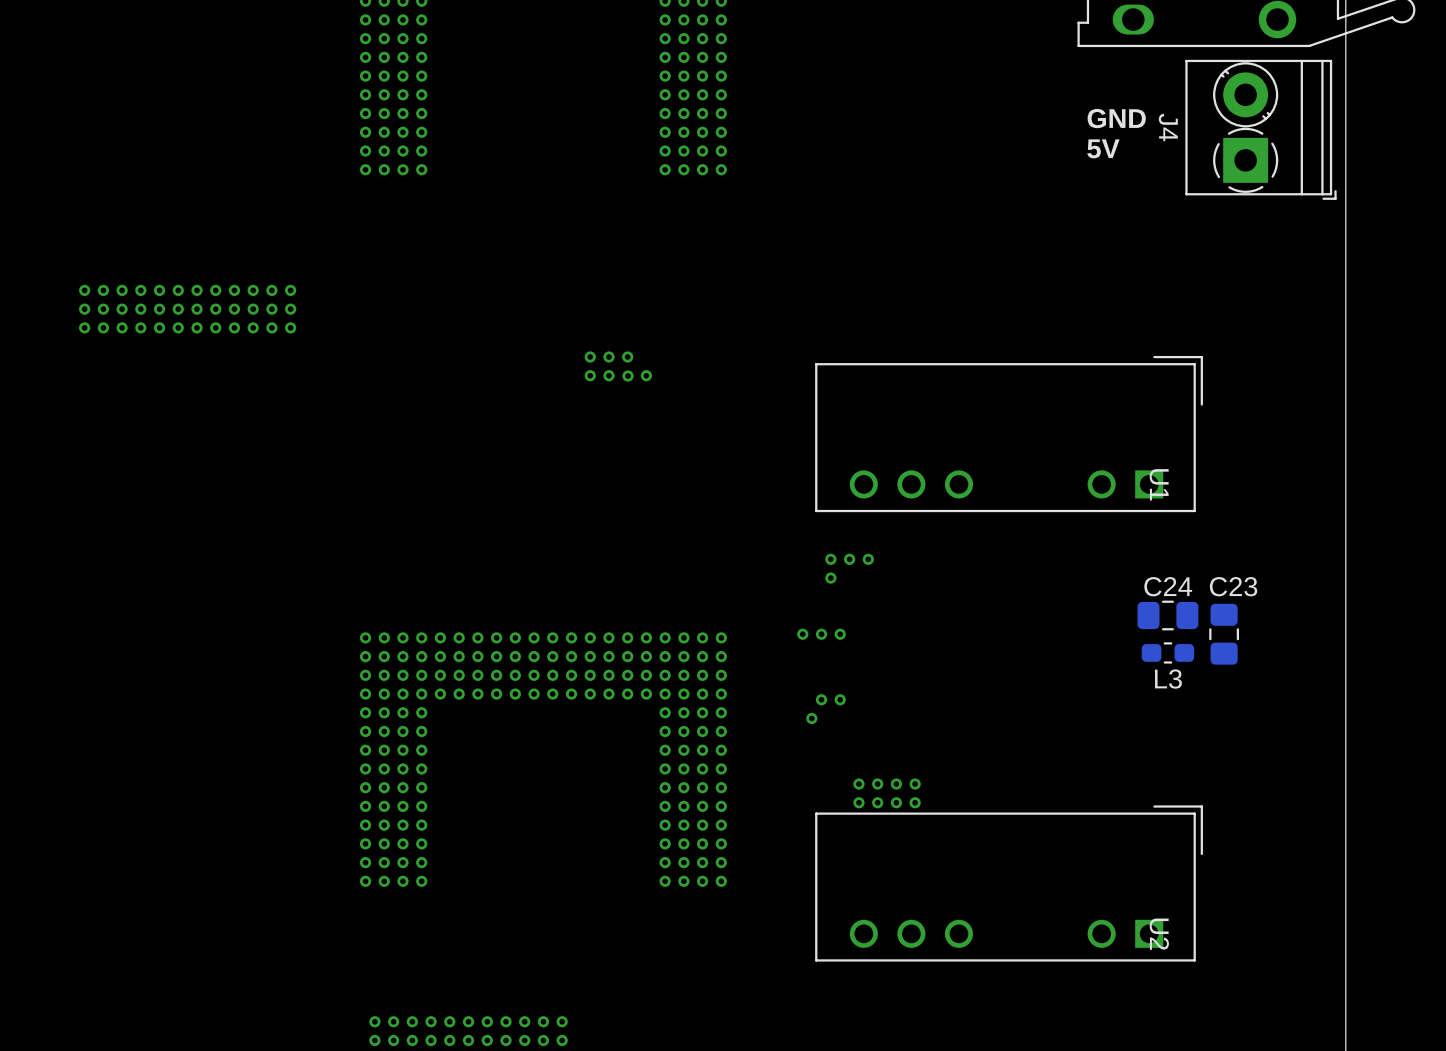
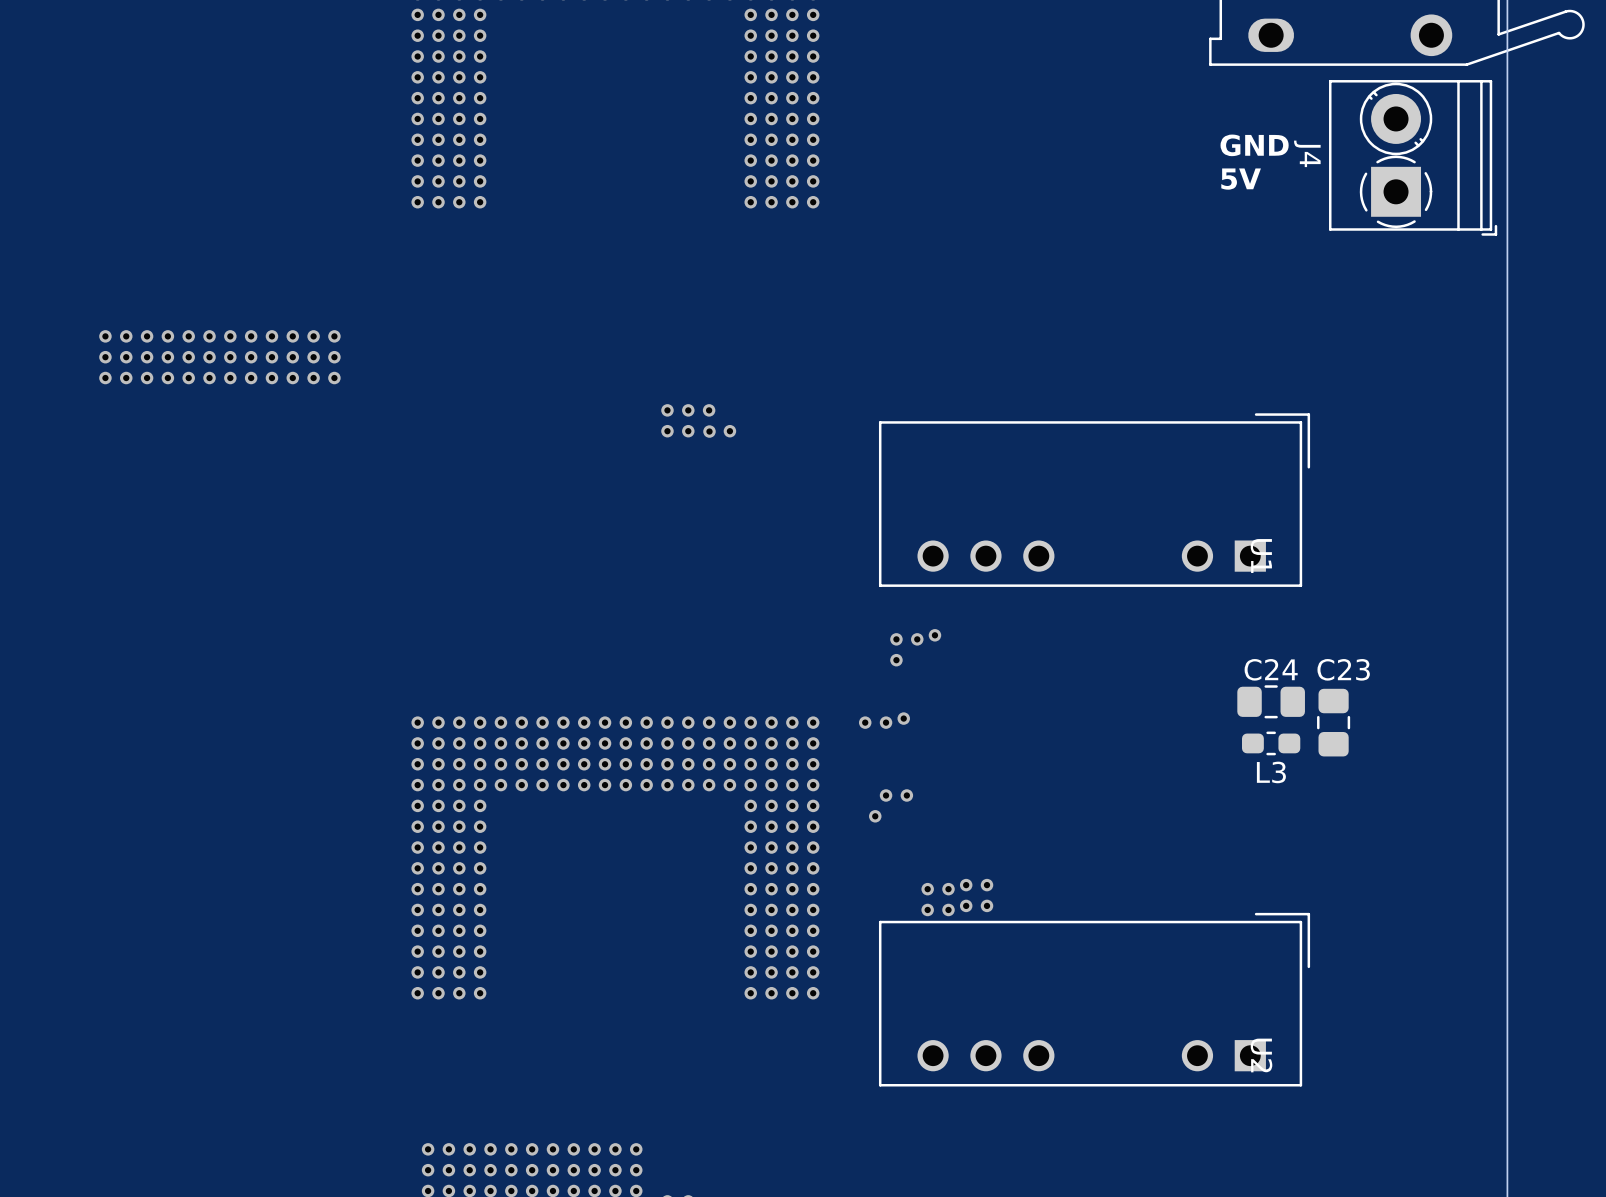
U1 position: (1009, 434) -> (1094, 500)
via: (849, 559) -> none
via: (868, 559) -> none
via: none -> (896, 639)
via: none -> (917, 639)
via: (830, 578) -> none
via: none -> (896, 660)
C24 position: (1167, 615) -> (1271, 701)
via: (821, 634) -> none
via: (840, 634) -> none
C23 position: (1224, 634) -> (1333, 722)
via: none -> (865, 722)
via: none -> (886, 722)
L3 position: (1167, 652) -> (1271, 743)
via: (821, 699) -> none
via: (840, 699) -> none
via: none -> (886, 795)
via: none -> (906, 795)
via: (811, 718) -> none
via: none -> (875, 816)
via: (896, 784) -> none
via: (915, 784) -> none
via: none -> (927, 889)
via: none -> (948, 889)
via: (896, 802) -> none
via: (915, 802) -> none
via: none -> (927, 909)
via: none -> (948, 909)
U2 position: (1009, 883) -> (1094, 999)

